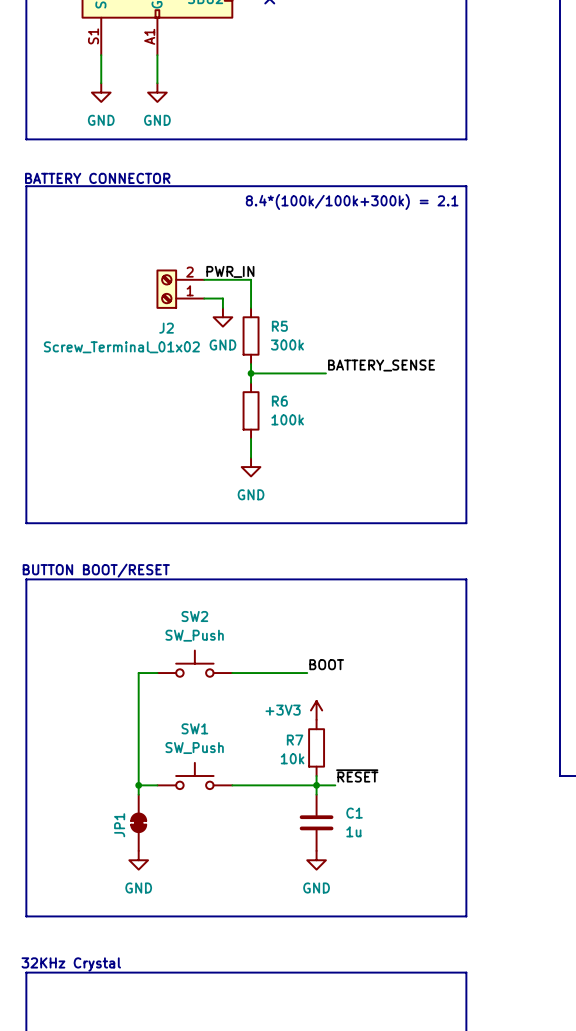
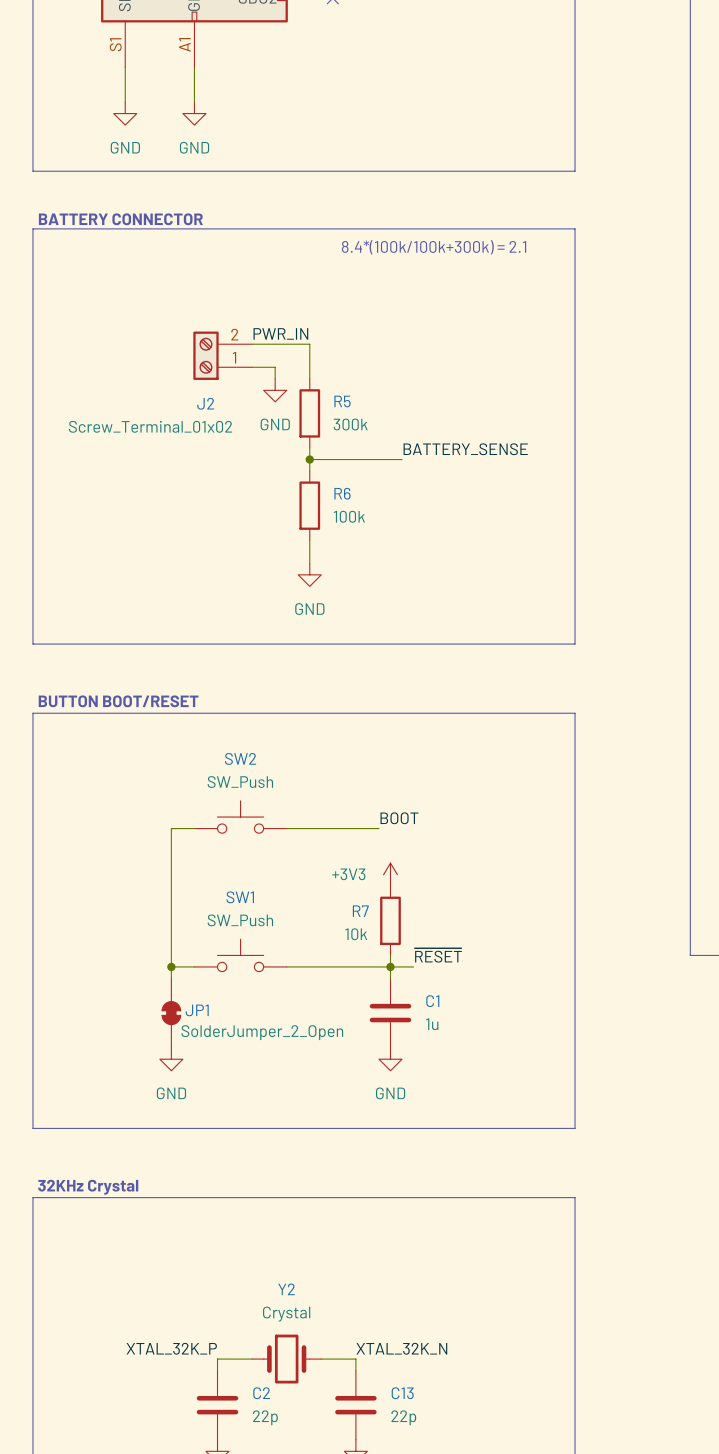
JP1 name rotation: 0° (119, 825) -> 90° clockwise (197, 1010)
JP1 name position: JP1 (119, 825) -> JP1 (197, 1010)
JP1 value: none -> SolderJumper_2_Open (262, 1032)

